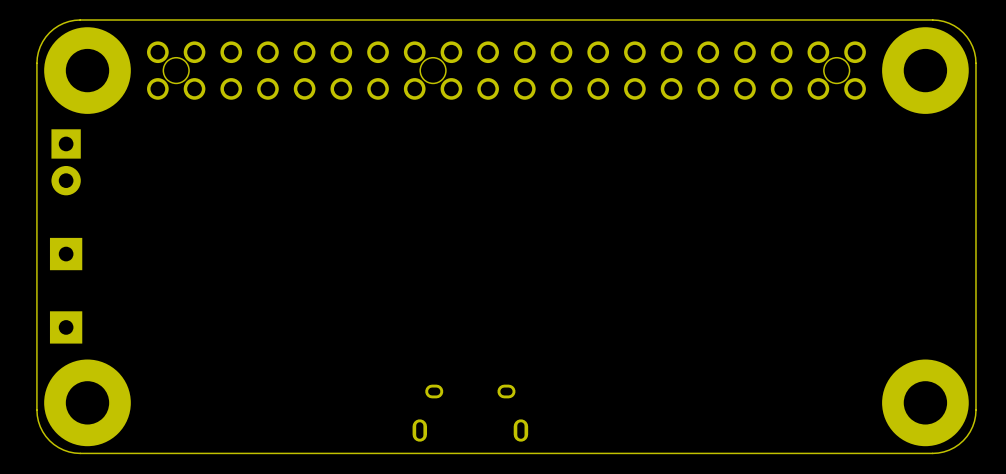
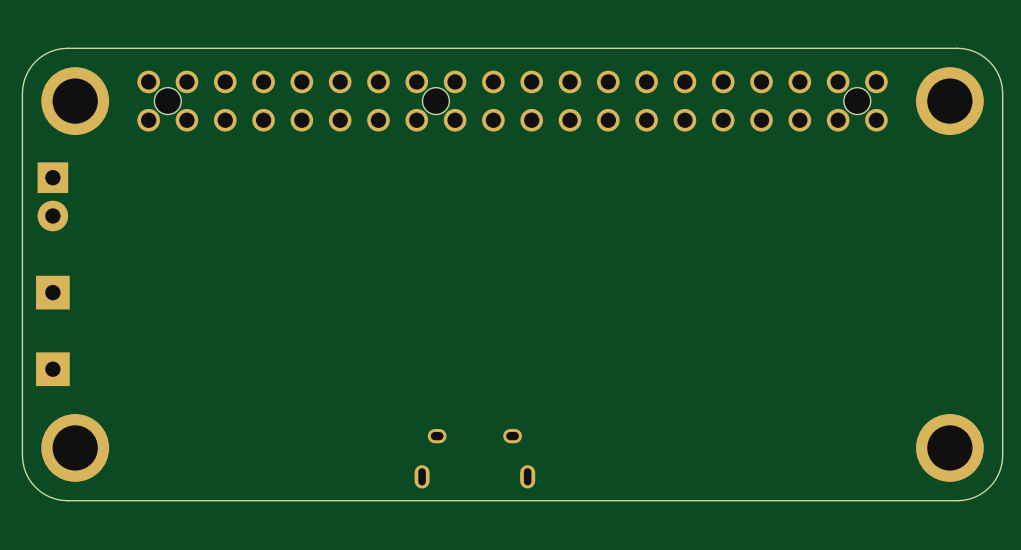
part footprint: [44, 27, 131, 114] -> [41, 67, 110, 136]
part footprint: [882, 27, 969, 114] -> [915, 67, 984, 136]
part footprint: [44, 359, 131, 447] -> [41, 414, 110, 482]
part footprint: [882, 359, 969, 447] -> [915, 414, 984, 482]

